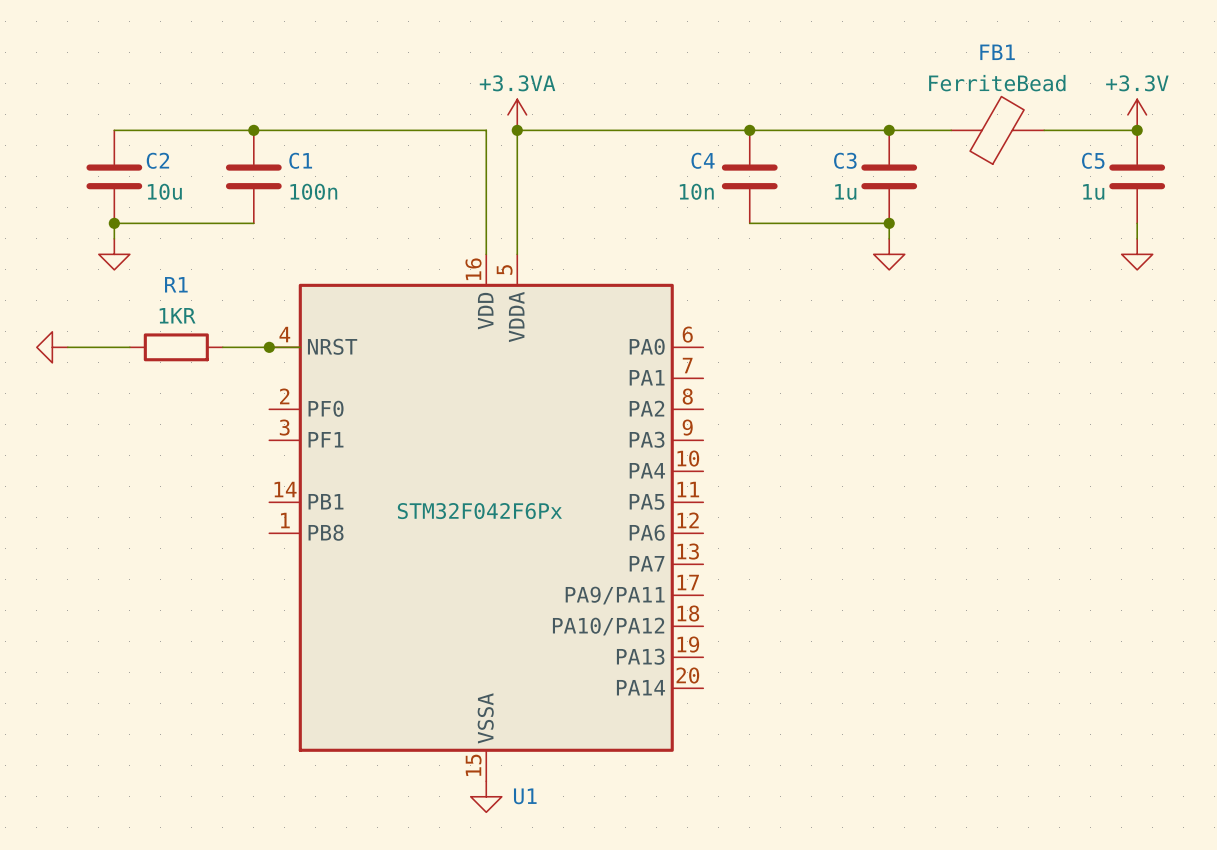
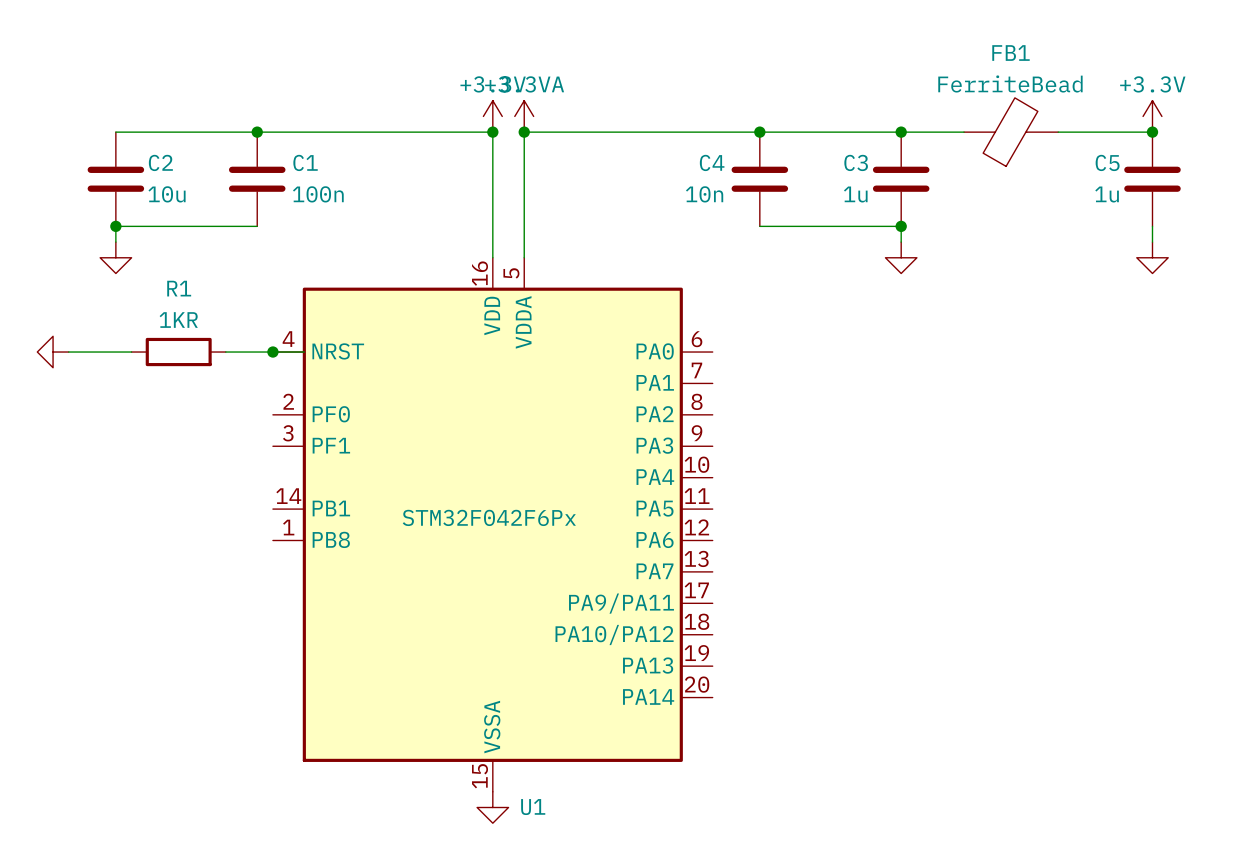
power symbol: none -> +3.3V (492, 116)
junction: none -> (492, 132)

